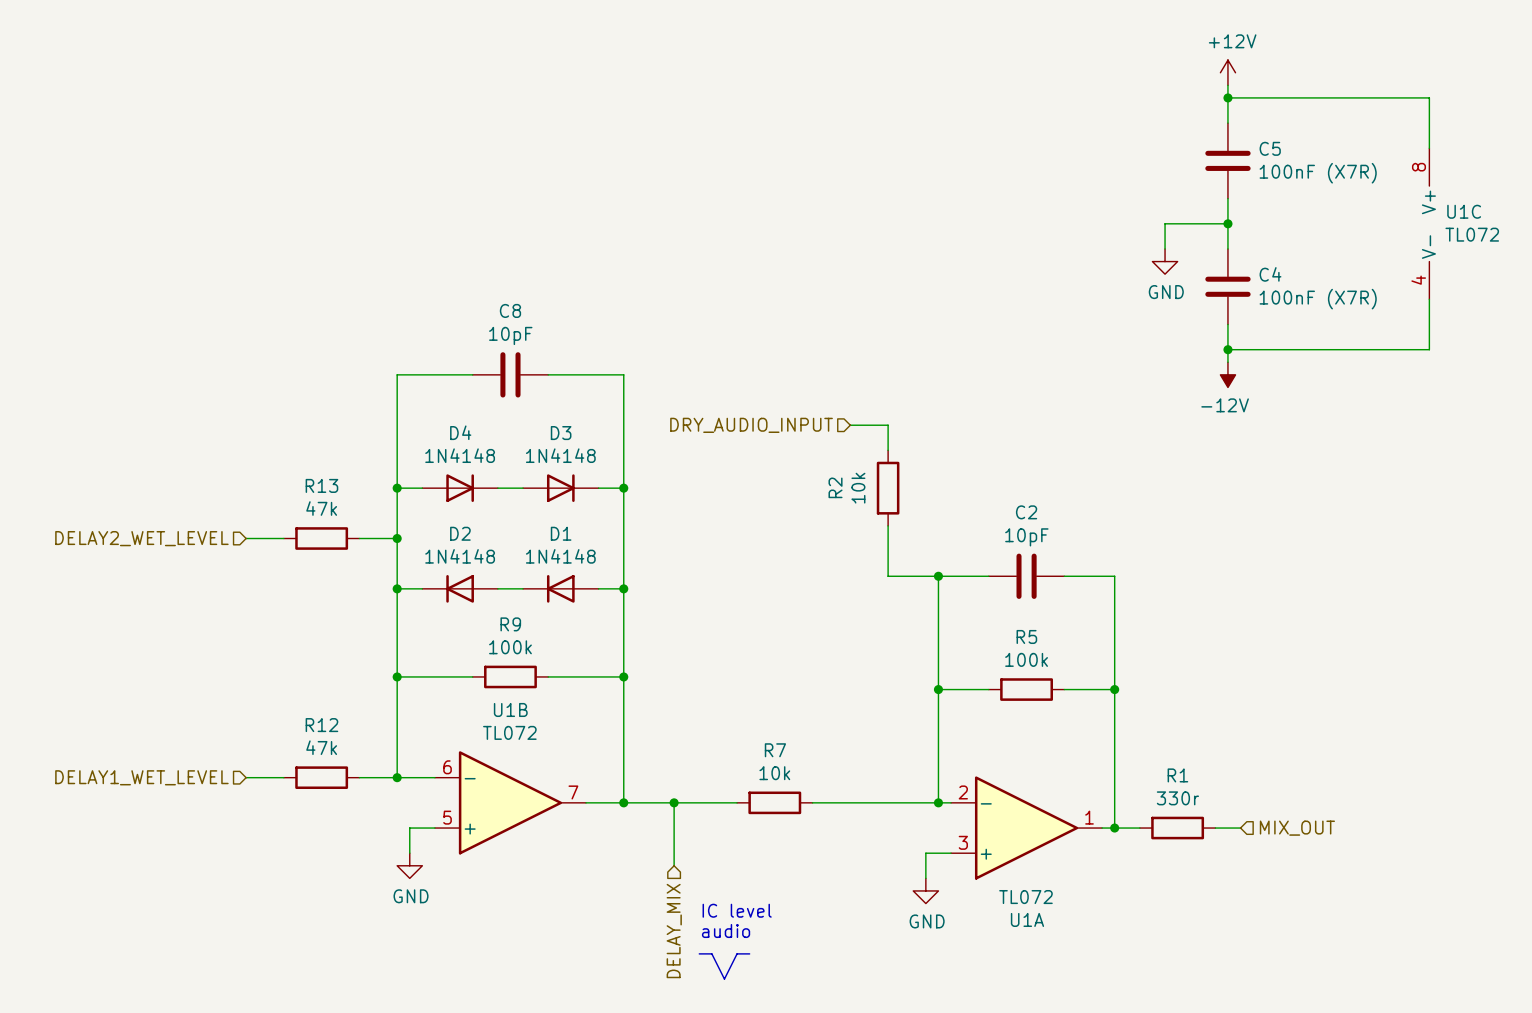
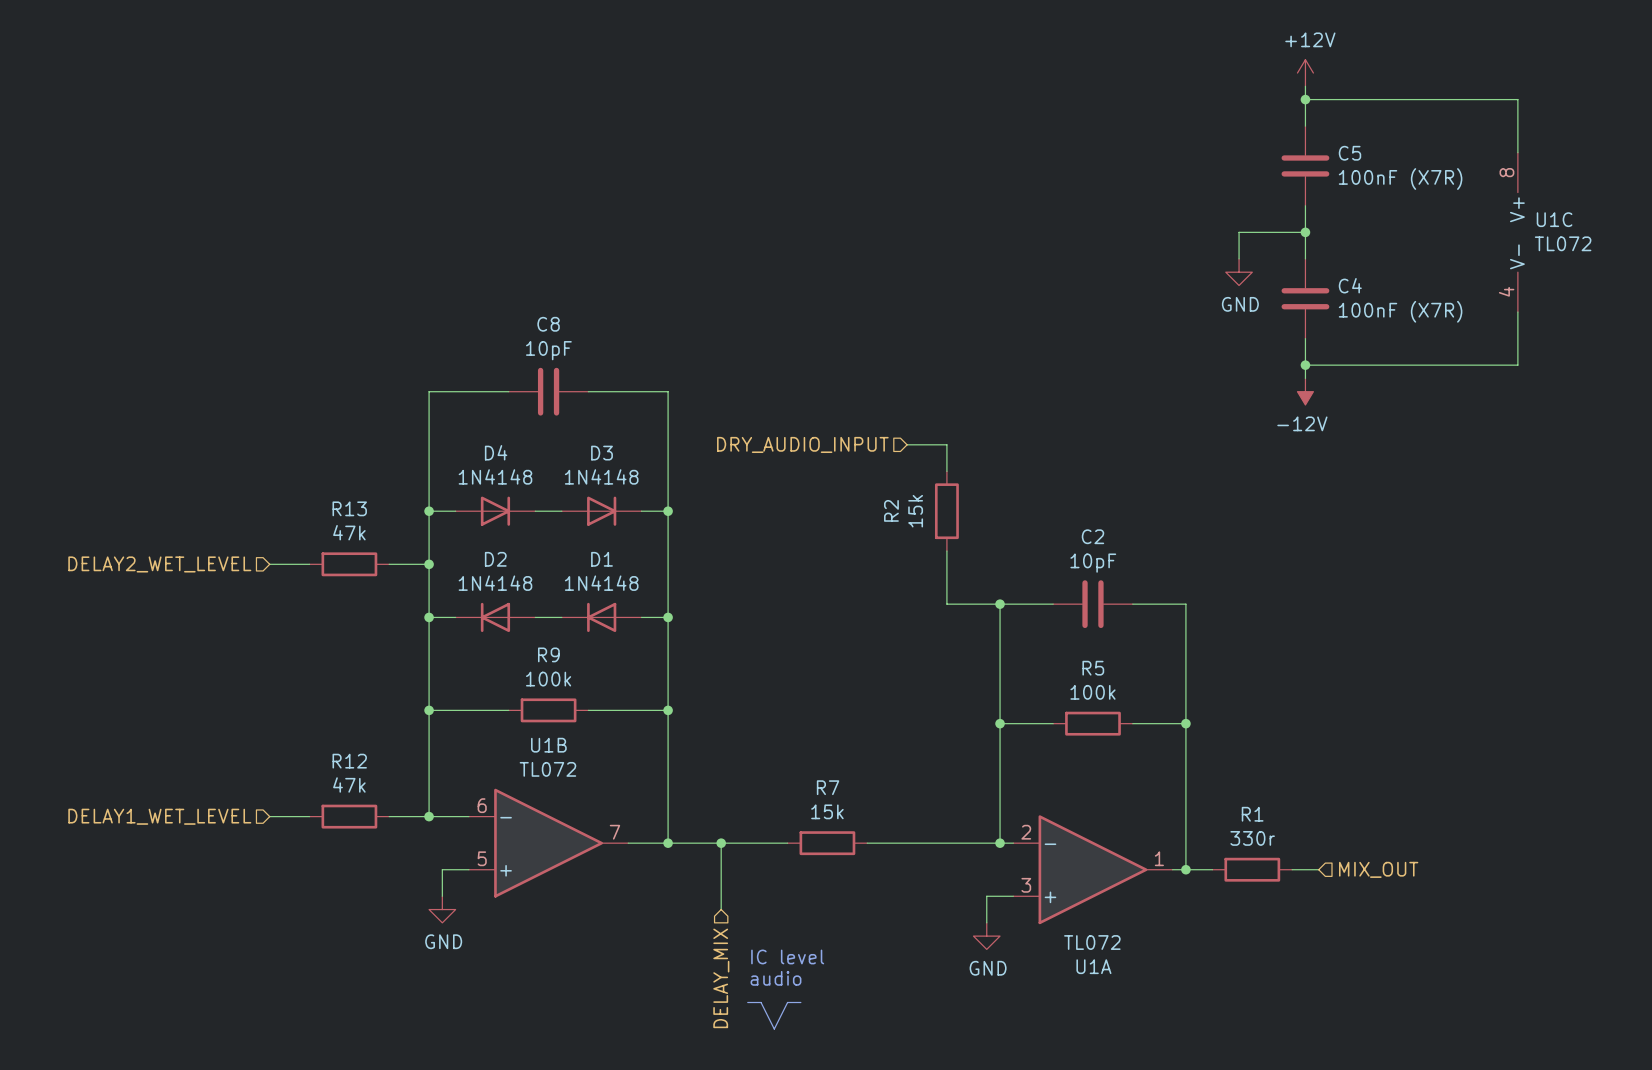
R2 value: 10k (858, 488) -> 15k (915, 511)
R7 value: 10k (774, 773) -> 15k (827, 811)

